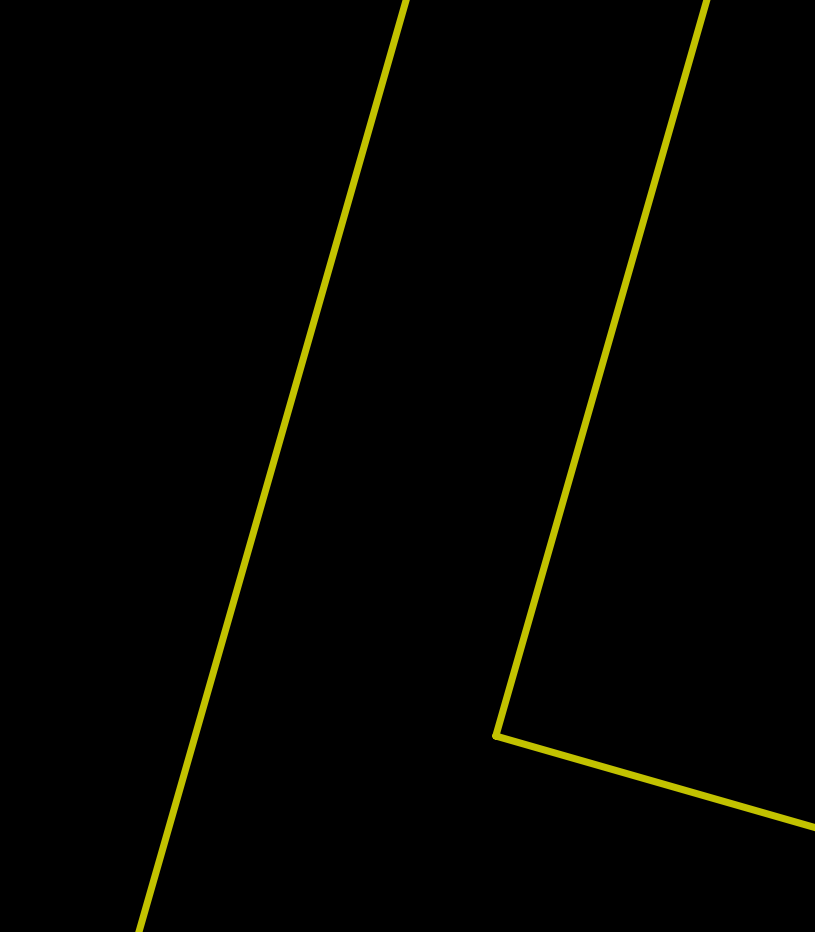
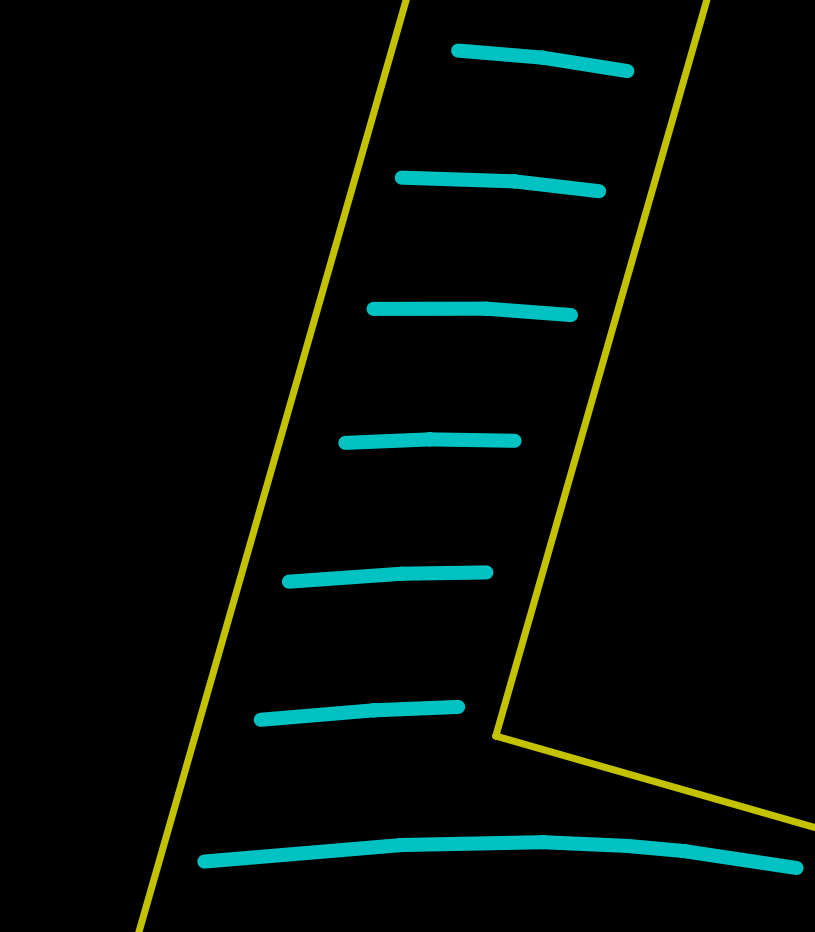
line: none -> (458, 50) (542, 57) (627, 71)
line: none -> (401, 177) (514, 181) (599, 191)
line: none -> (373, 308) (486, 308) (570, 315)
line: none -> (514, 440) (429, 439) (345, 442)
line: none -> (486, 572) (401, 573) (288, 581)
line: none -> (458, 706) (373, 710) (260, 719)
line: none -> (204, 861) (401, 845) (542, 842) (627, 845) (683, 851) (796, 868)

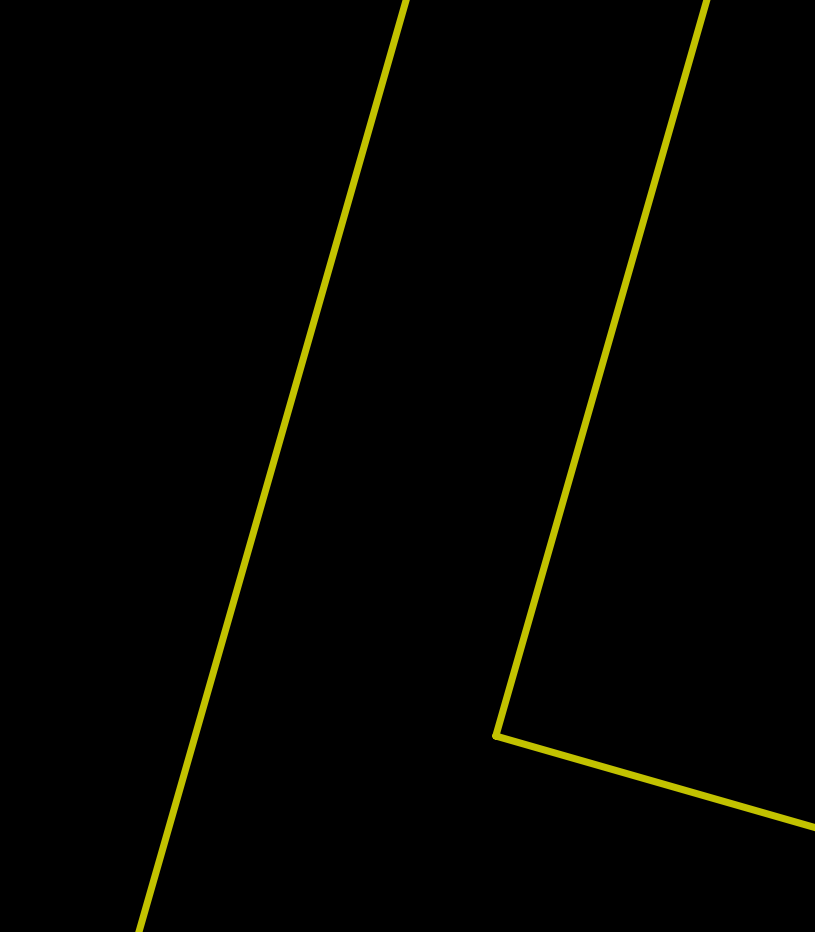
line: (458, 50) (542, 57) (627, 71) -> none
line: (401, 177) (514, 181) (599, 191) -> none
line: (373, 308) (486, 308) (570, 315) -> none
line: (514, 440) (429, 439) (345, 442) -> none
line: (486, 572) (401, 573) (288, 581) -> none
line: (458, 706) (373, 710) (260, 719) -> none
line: (204, 861) (401, 845) (542, 842) (627, 845) (683, 851) (796, 868) -> none

